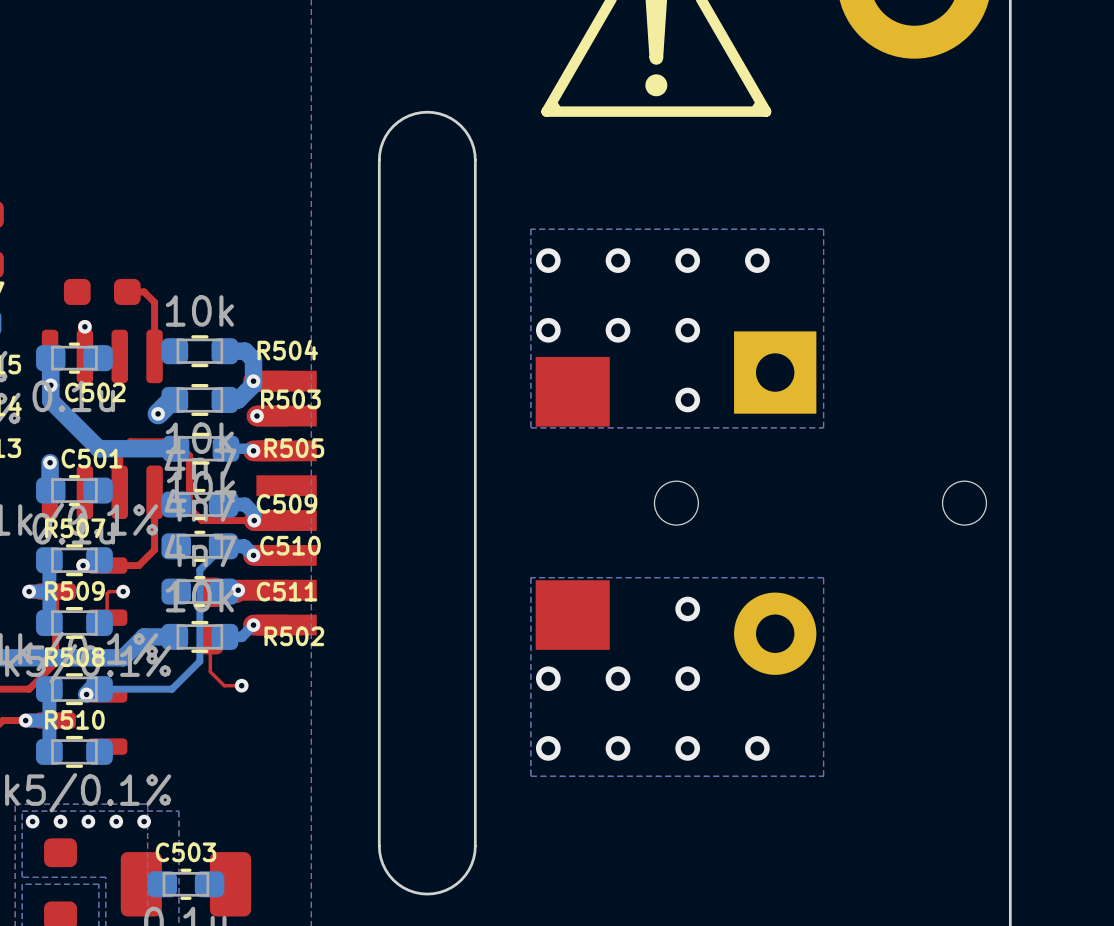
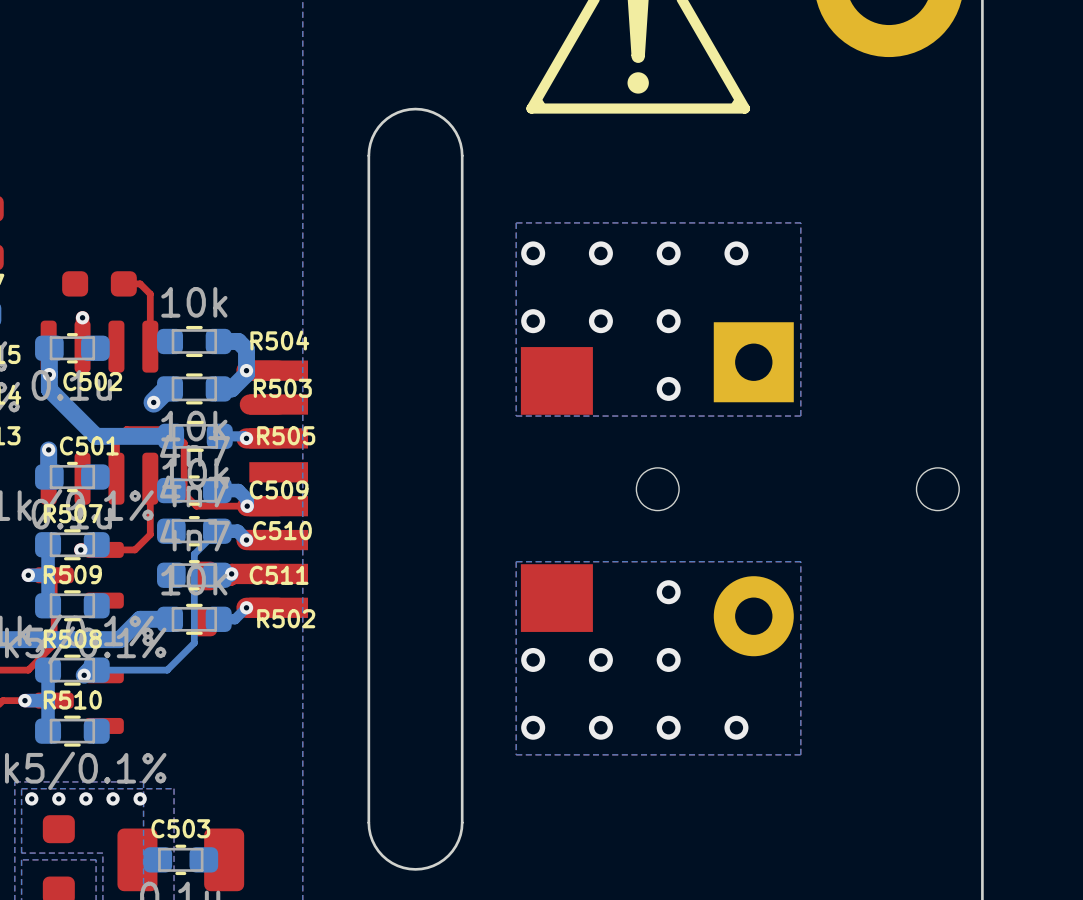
via: (257, 416) -> none
top track: (123, 591) (109, 591) (107, 593) (107, 617) -> none
via: (123, 591) -> none
top track: (210, 639) (210, 671) (224, 685) (241, 685) -> none
via: (241, 685) -> none

